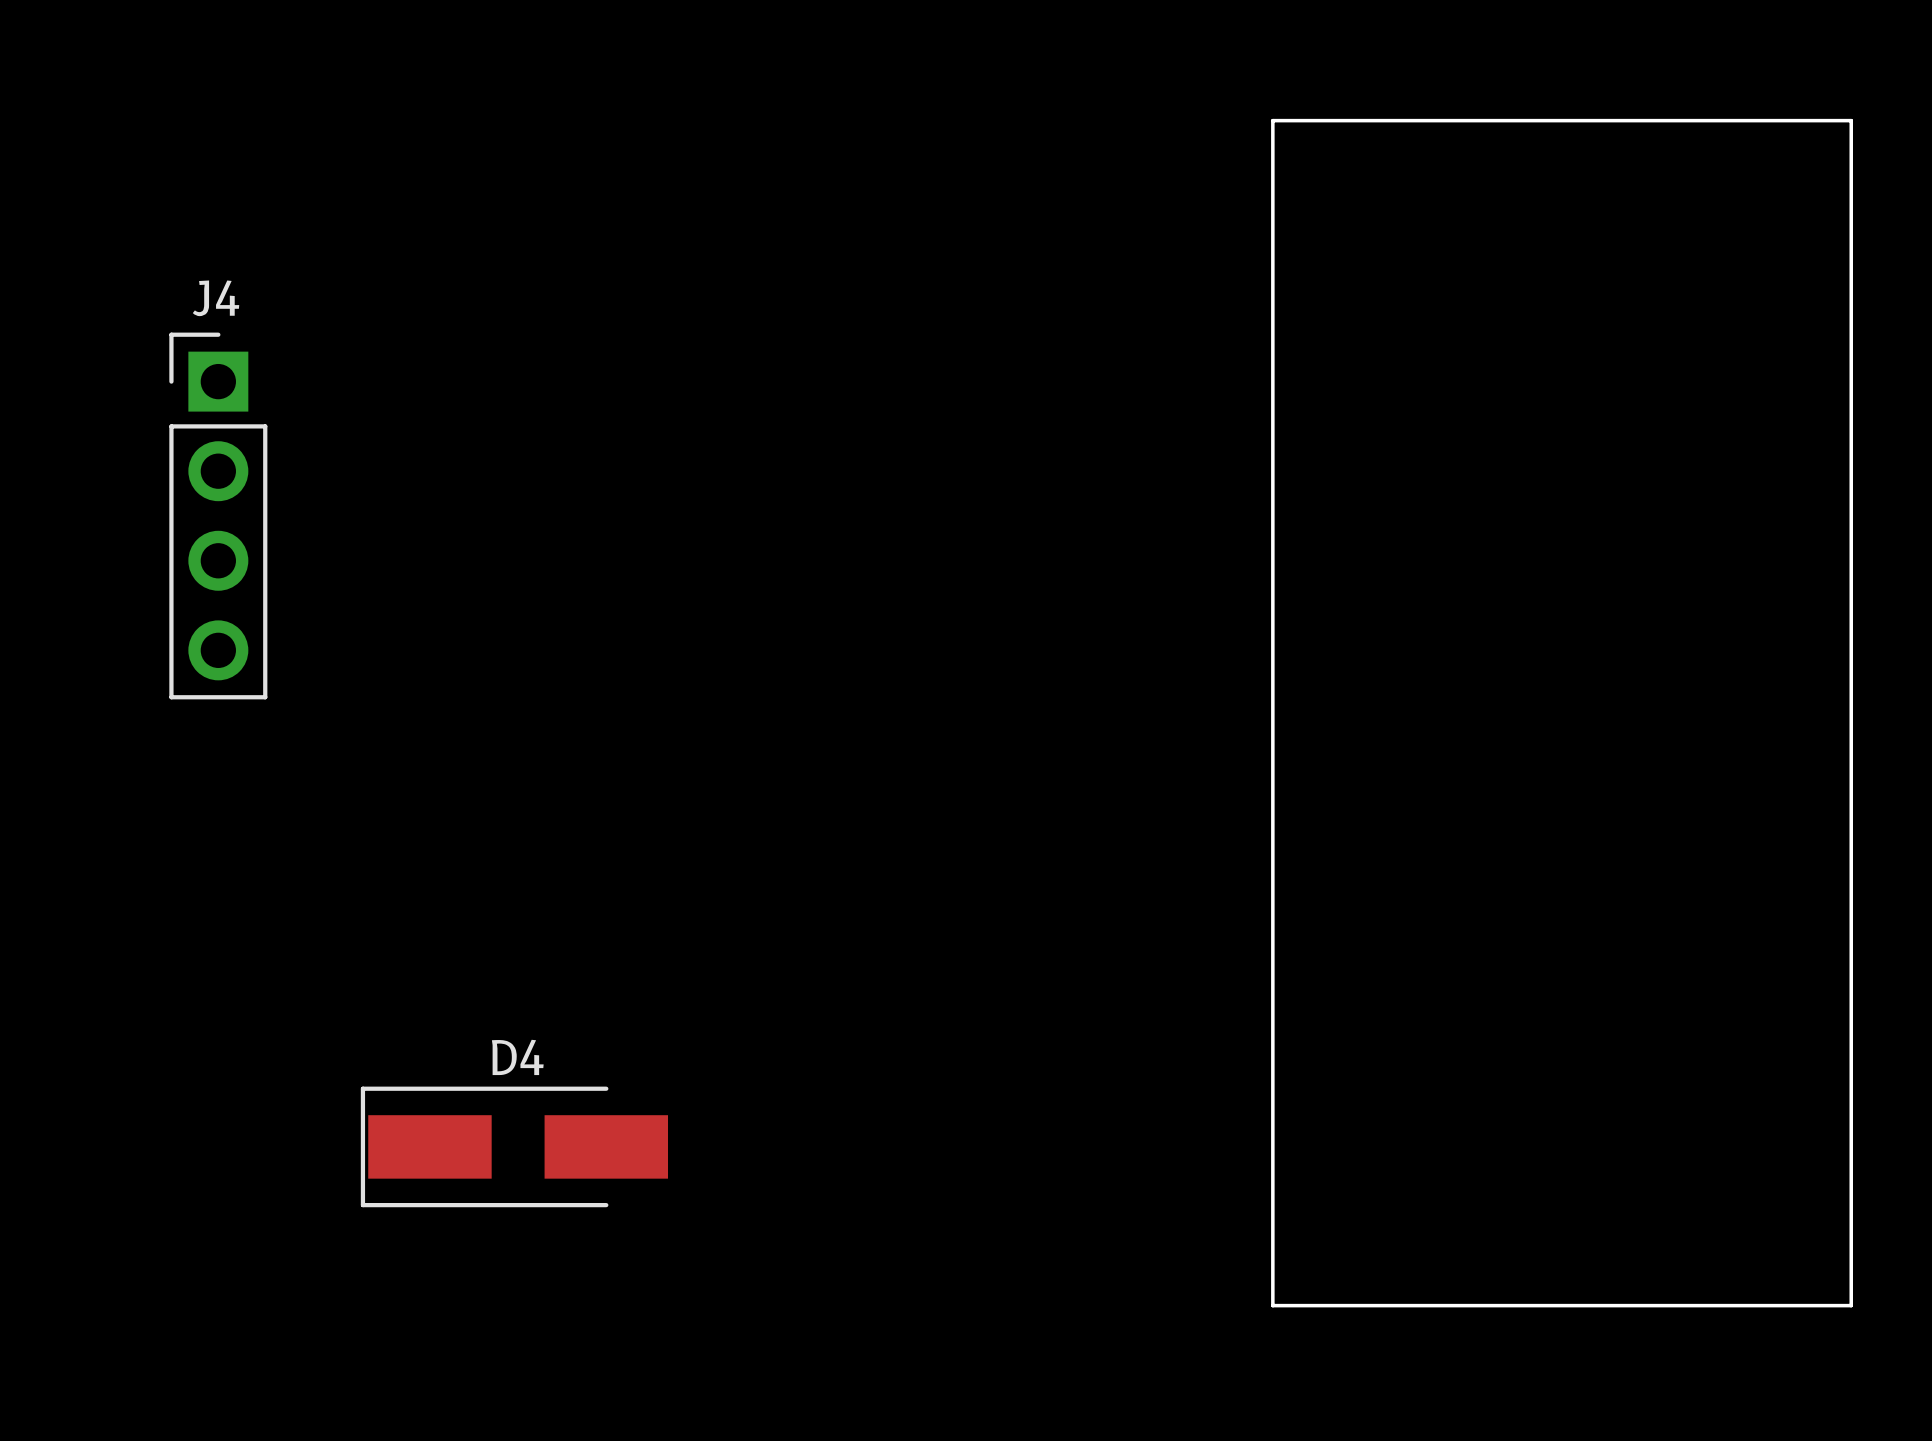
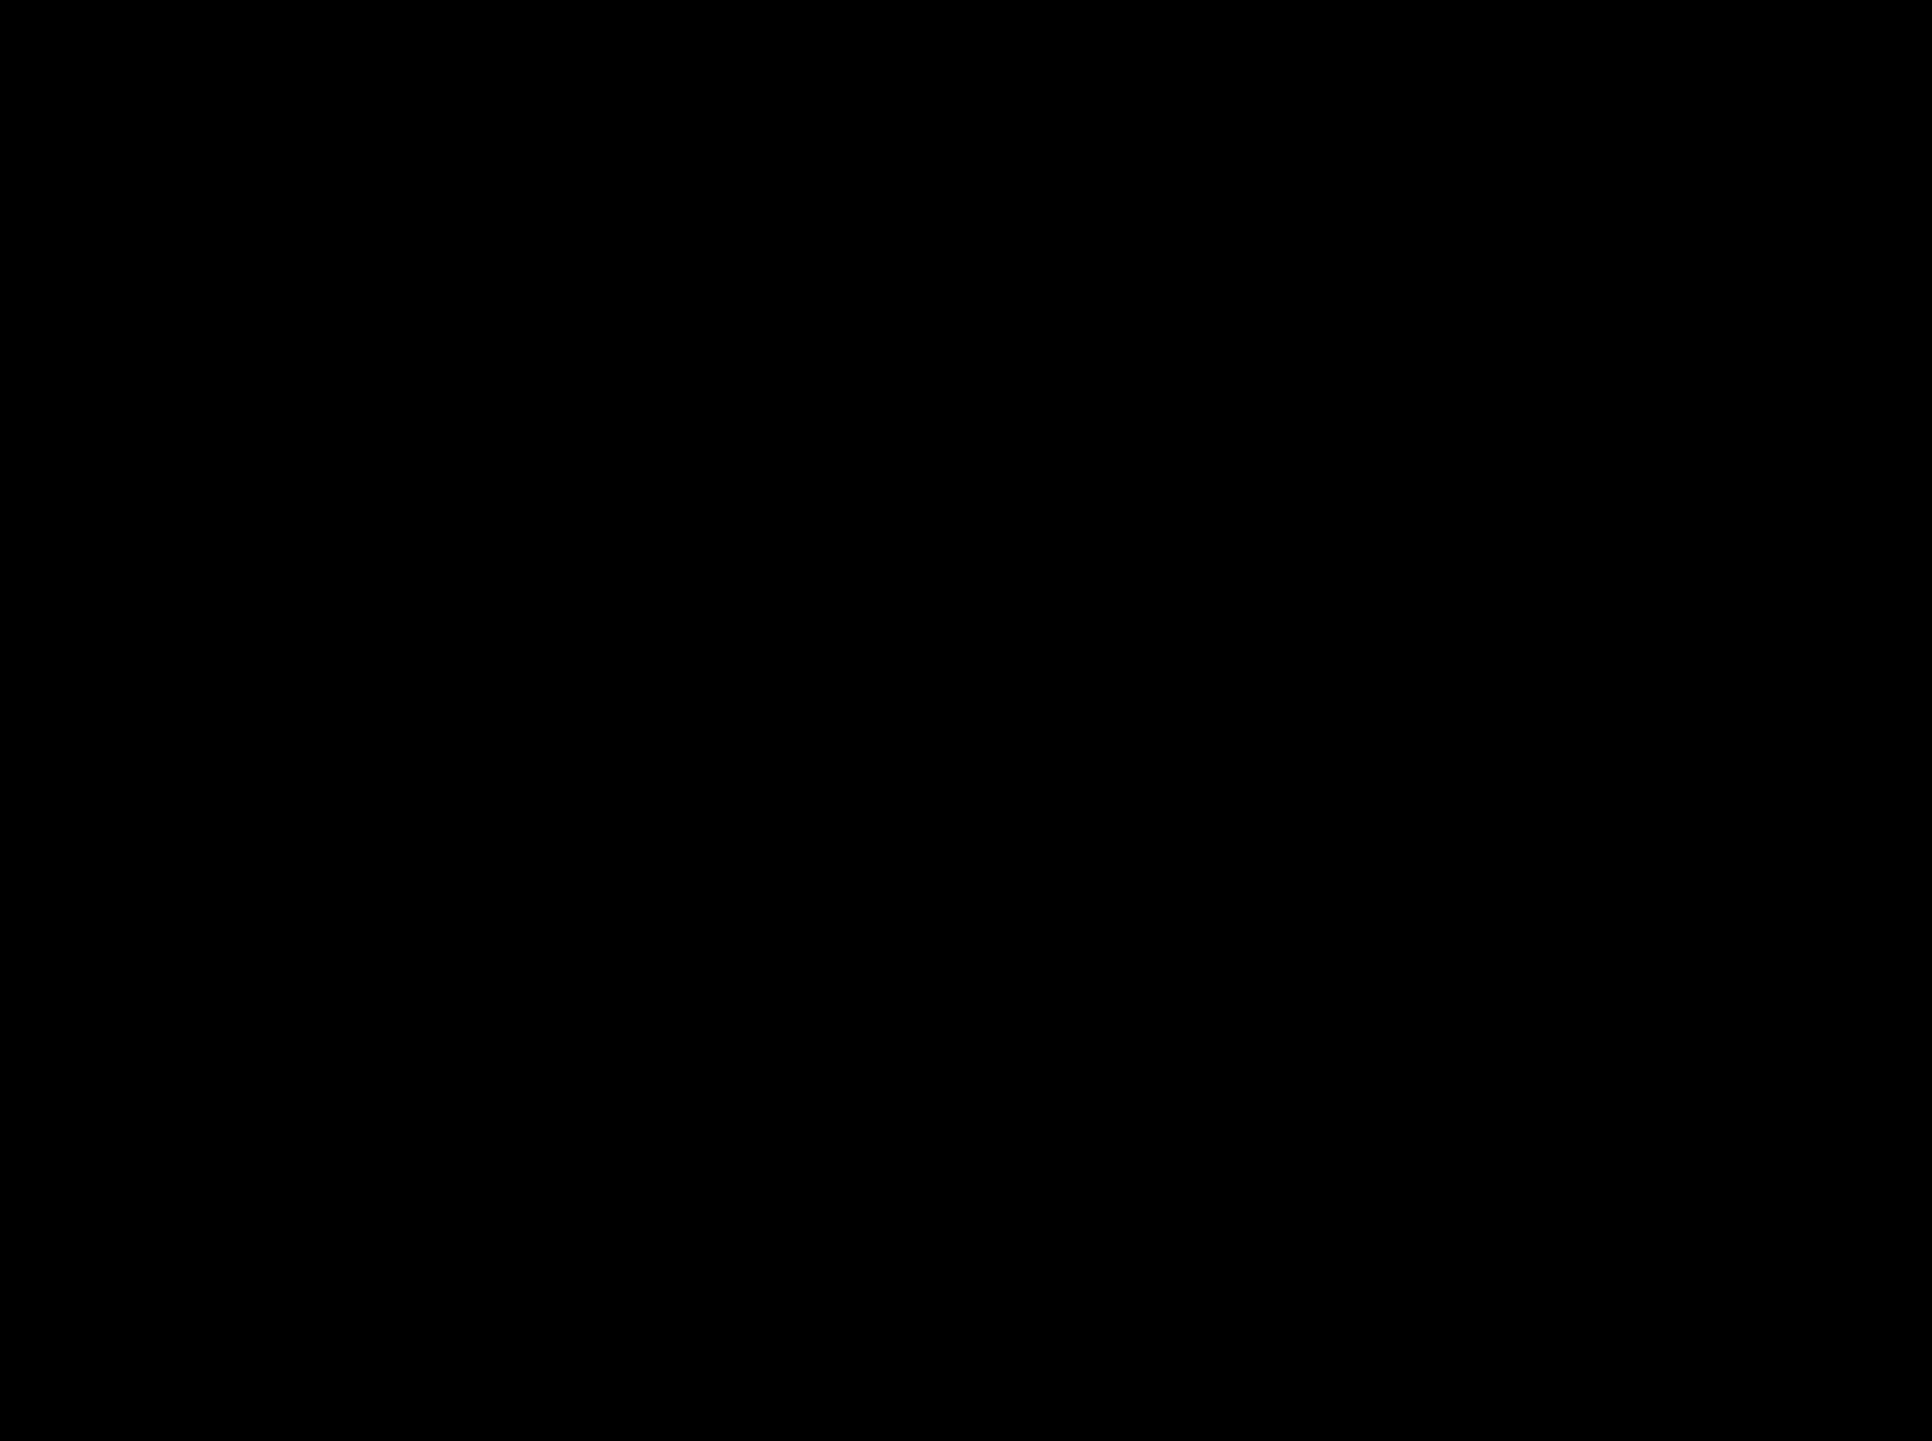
board edge: (1272, 120) (1851, 120) (1851, 1305) (1272, 1305) (1272, 120) -> none
J4: (218, 515) -> none
D4: (514, 1146) -> none

